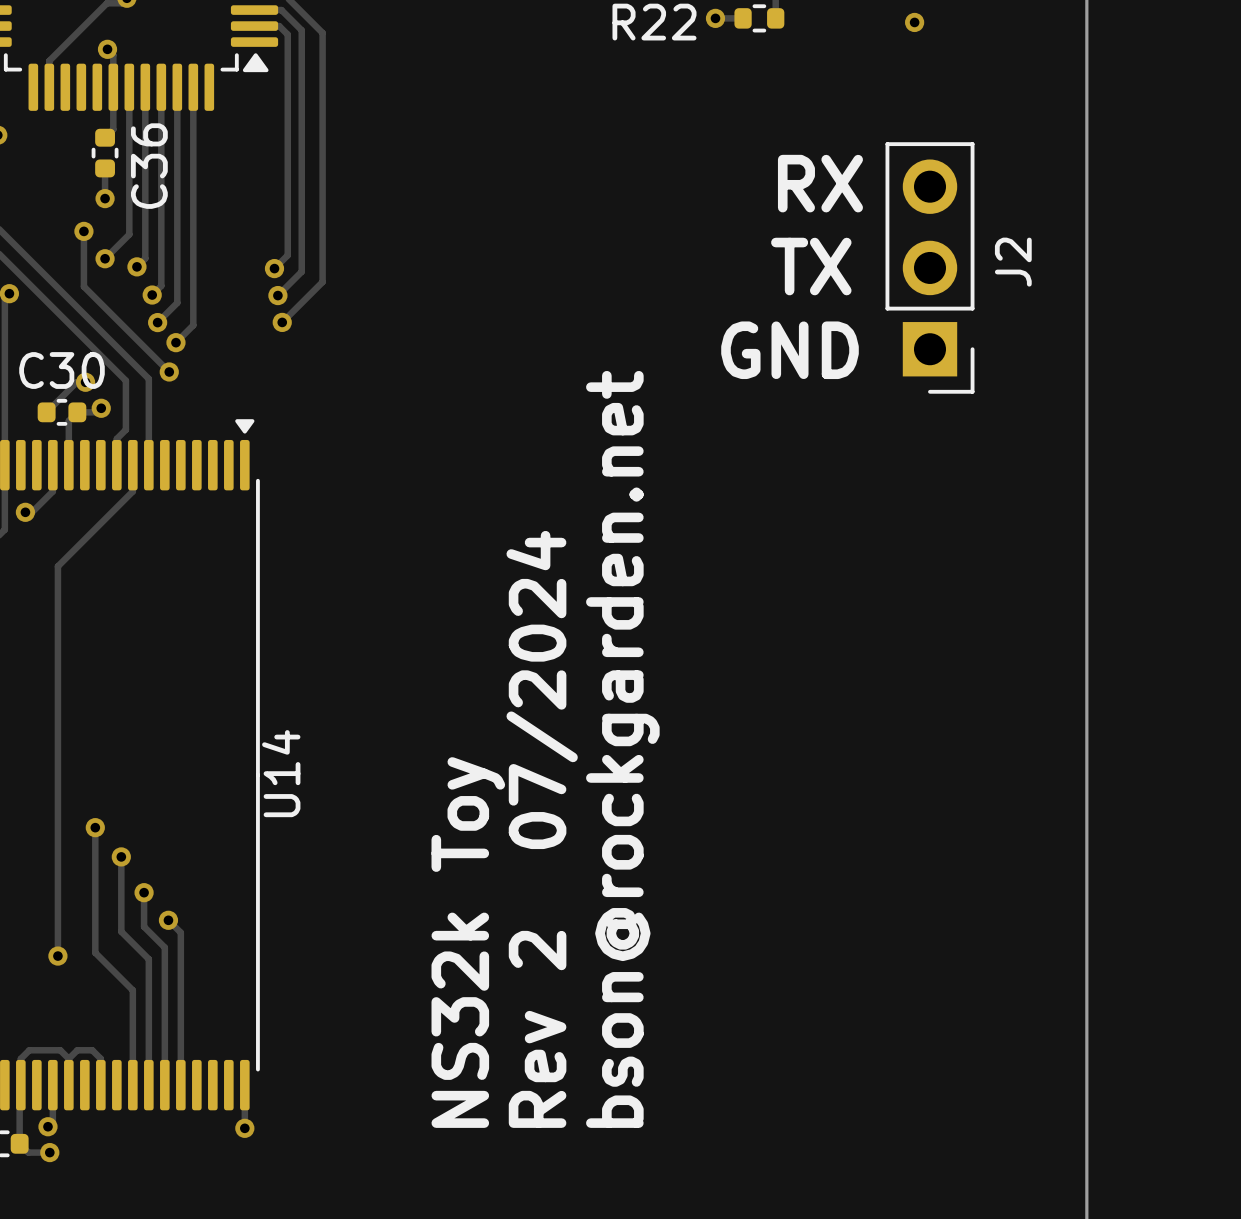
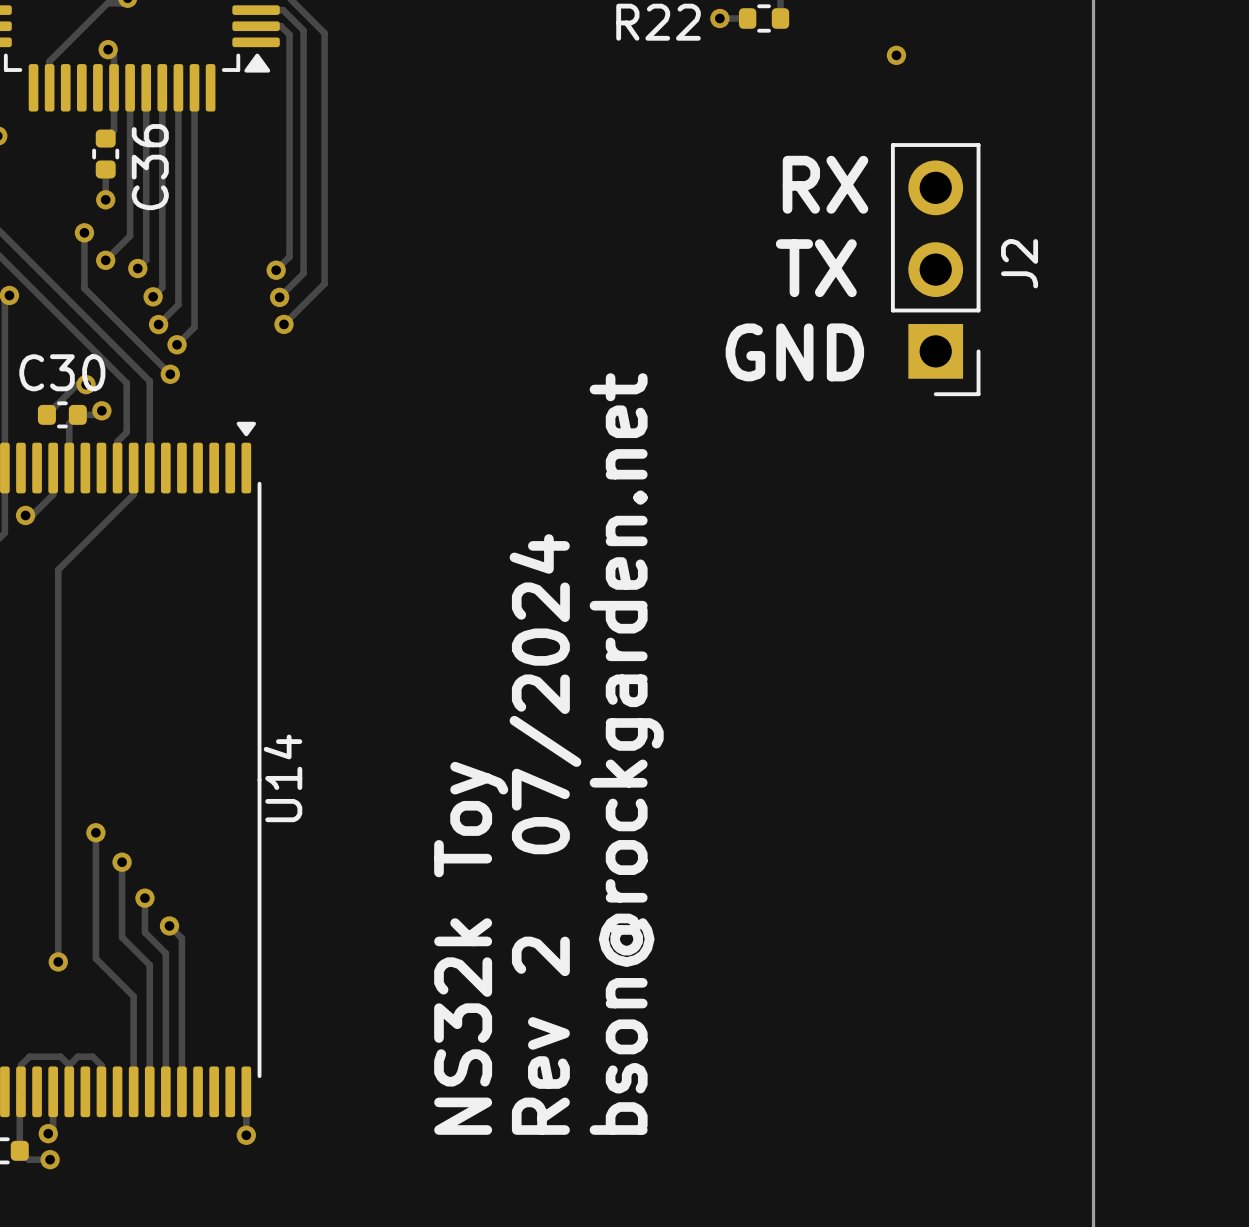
via position: (914, 22) -> (896, 55)

